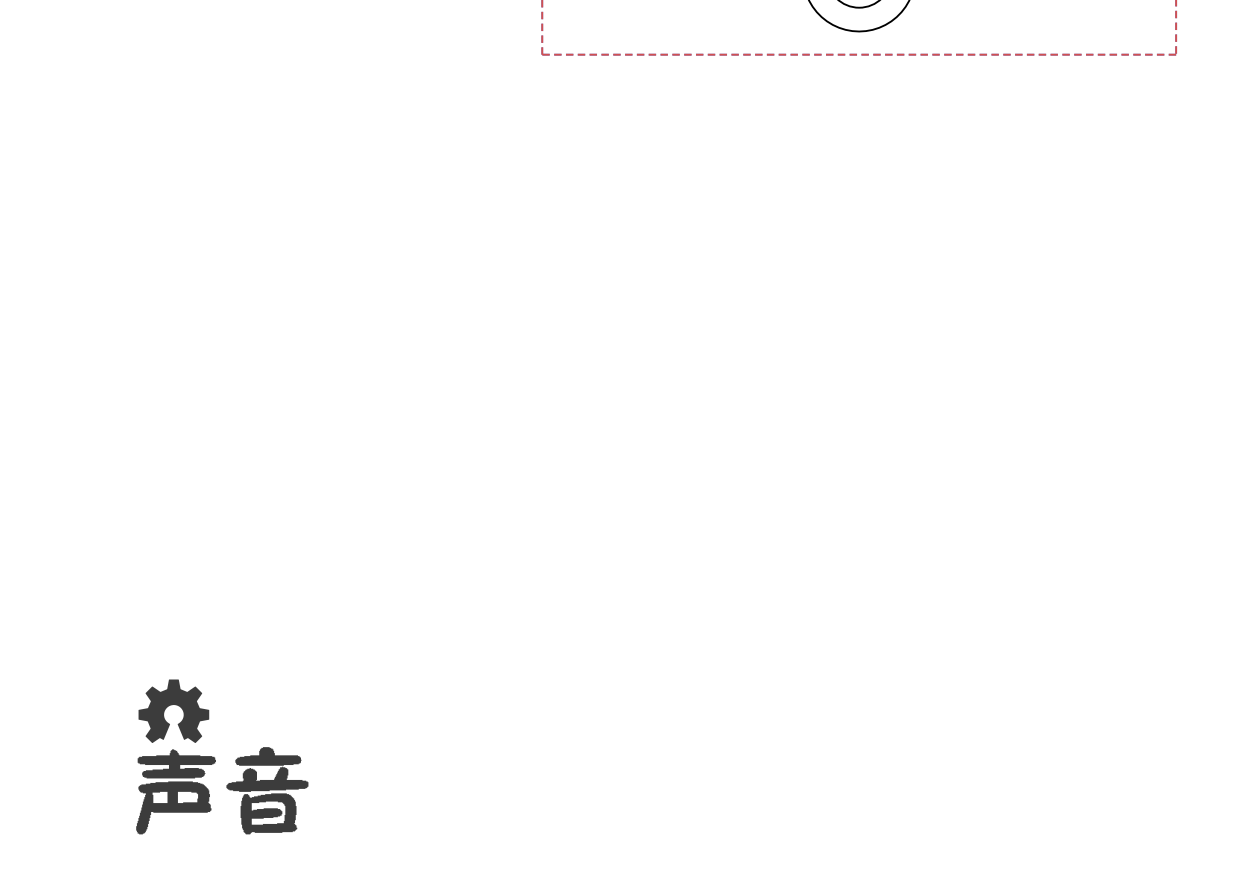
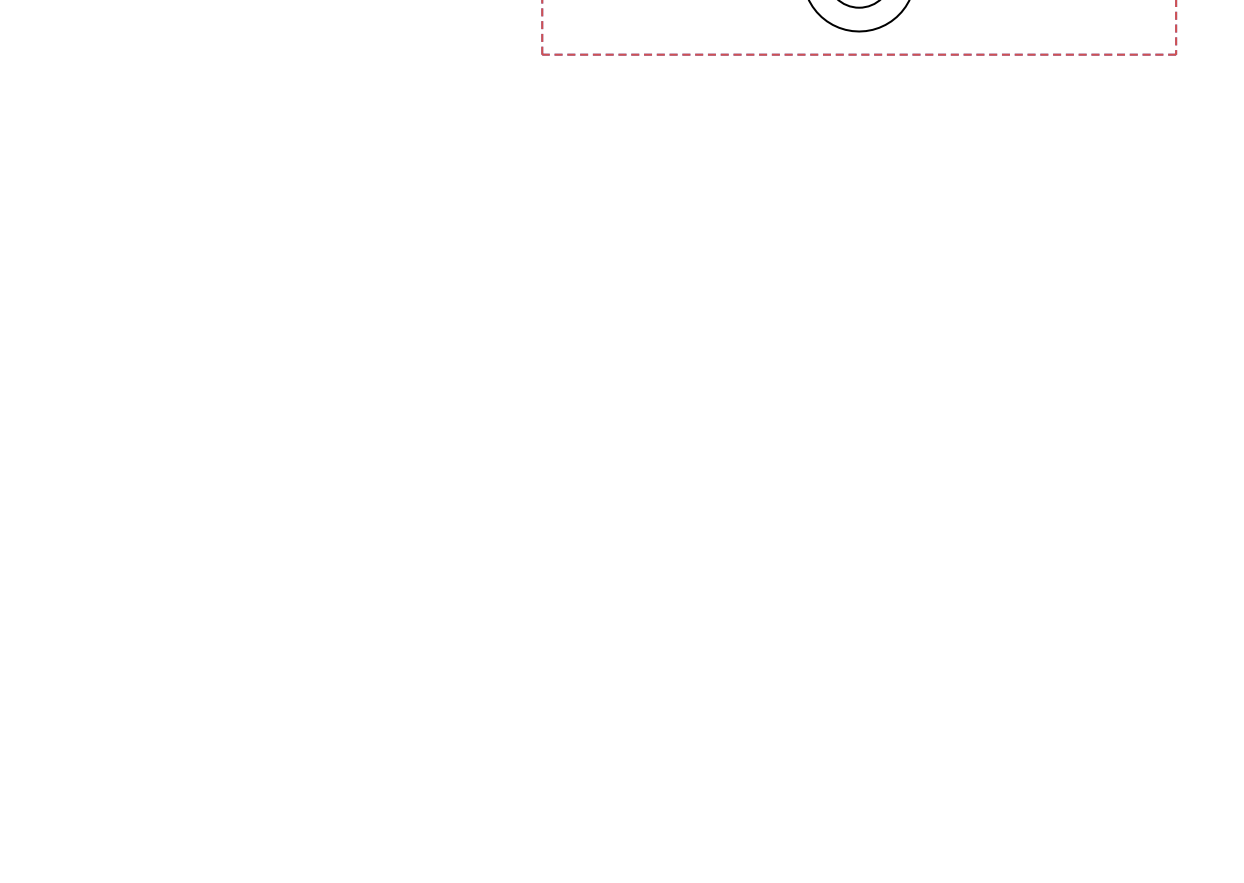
drawing: [136, 679, 309, 835] -> none

